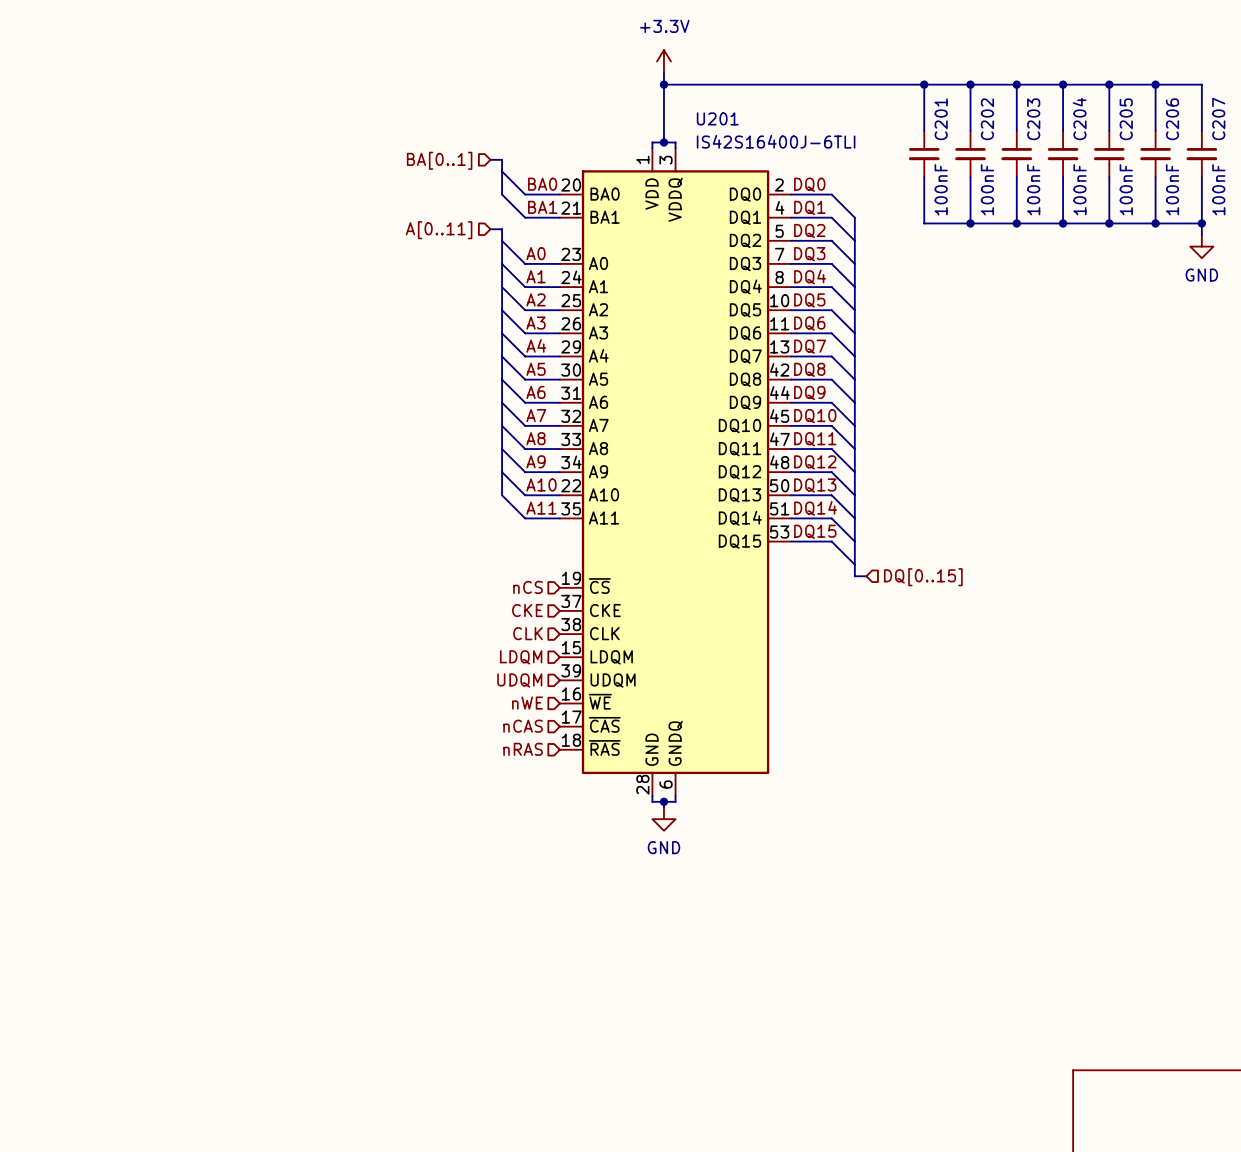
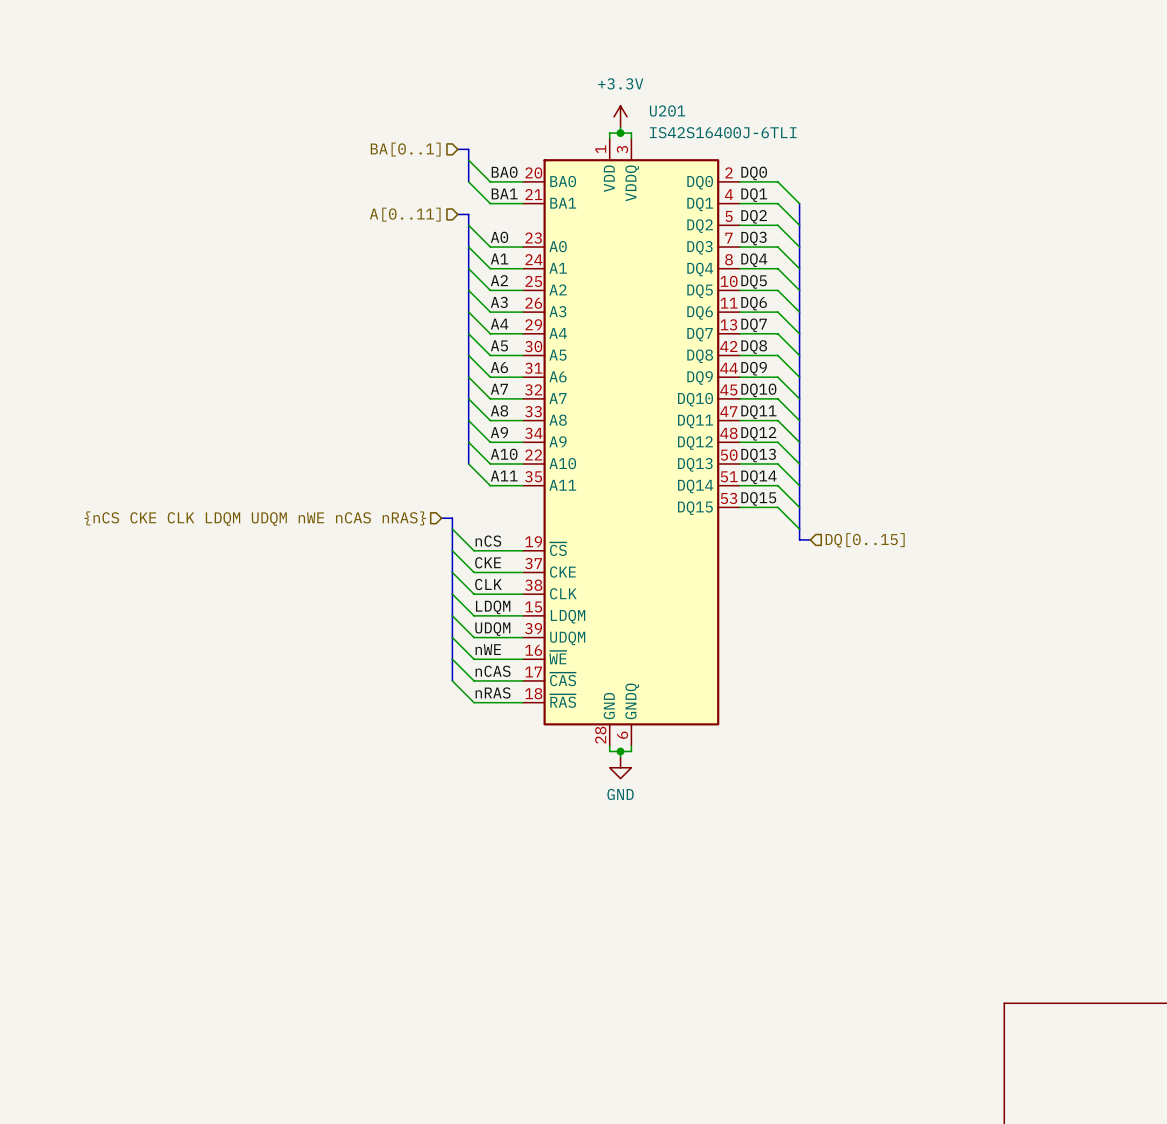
power symbol position: +3.3V (663, 61) -> +3.3V (620, 116)
wire: (663, 73) (663, 136) -> none
wire: (663, 84) (1201, 84) (1201, 130) -> none
junction: (663, 84) -> none
wire: (924, 84) (924, 130) -> none
junction: (924, 84) -> none
wire: (970, 84) (970, 130) -> none
junction: (970, 84) -> none
wire: (1016, 84) (1016, 130) -> none
junction: (1016, 84) -> none
wire: (1063, 84) (1063, 130) -> none
junction: (1063, 84) -> none
wire: (1109, 84) (1109, 130) -> none
junction: (1109, 84) -> none
wire: (1155, 84) (1155, 130) -> none
junction: (1155, 84) -> none
C201: 100nF (924, 154) -> none
C202: 100nF (970, 154) -> none
C203: 100nF (1016, 154) -> none
C204: 100nF (1063, 154) -> none
C205: 100nF (1109, 154) -> none
C206: 100nF (1155, 154) -> none
C207: 100nF (1201, 154) -> none
wire: (924, 177) (924, 223) (1201, 223) -> none
wire: (970, 177) (970, 223) -> none
wire: (1016, 177) (1016, 223) -> none
wire: (1063, 177) (1063, 223) -> none
wire: (1109, 177) (1109, 223) -> none
wire: (1155, 177) (1155, 223) -> none
wire: (1201, 177) (1201, 235) -> none
junction: (970, 223) -> none
junction: (1016, 223) -> none
junction: (1063, 223) -> none
junction: (1109, 223) -> none
junction: (1155, 223) -> none
junction: (1201, 223) -> none
power symbol: GND (1201, 246) -> none
bus: none -> (441, 518) (452, 518) (452, 680)
hierarchical label: none -> {nCS CKE CLK LDQM UDQM nWE nCAS nRAS} (255, 518)
wire: none -> (452, 529) (474, 550) (522, 550)
label: none -> nCS (488, 541)
wire: none -> (452, 550) (474, 572) (522, 572)
hierarchical label: nCS (528, 587) -> none
label: none -> CKE (488, 562)
wire: none -> (452, 572) (474, 594) (522, 594)
hierarchical label: CKE (527, 610) -> none
label: none -> CLK (488, 584)
hierarchical label: CLK (528, 633) -> none
wire: none -> (452, 594) (474, 615) (522, 615)
label: none -> LDQM (493, 607)
wire: none -> (452, 615) (474, 637) (522, 637)
hierarchical label: LDQM (521, 657) -> none
label: none -> UDQM (492, 629)
wire: none -> (452, 637) (474, 659) (522, 659)
hierarchical label: UDQM (519, 680) -> none
label: none -> nWE (488, 649)
wire: none -> (452, 659) (474, 680) (522, 680)
hierarchical label: nWE (527, 703) -> none
label: none -> nCAS (493, 671)
wire: none -> (452, 680) (474, 702) (522, 702)
hierarchical label: nCAS (523, 726) -> none
label: none -> nRAS (493, 692)
hierarchical label: nRAS (523, 749) -> none

